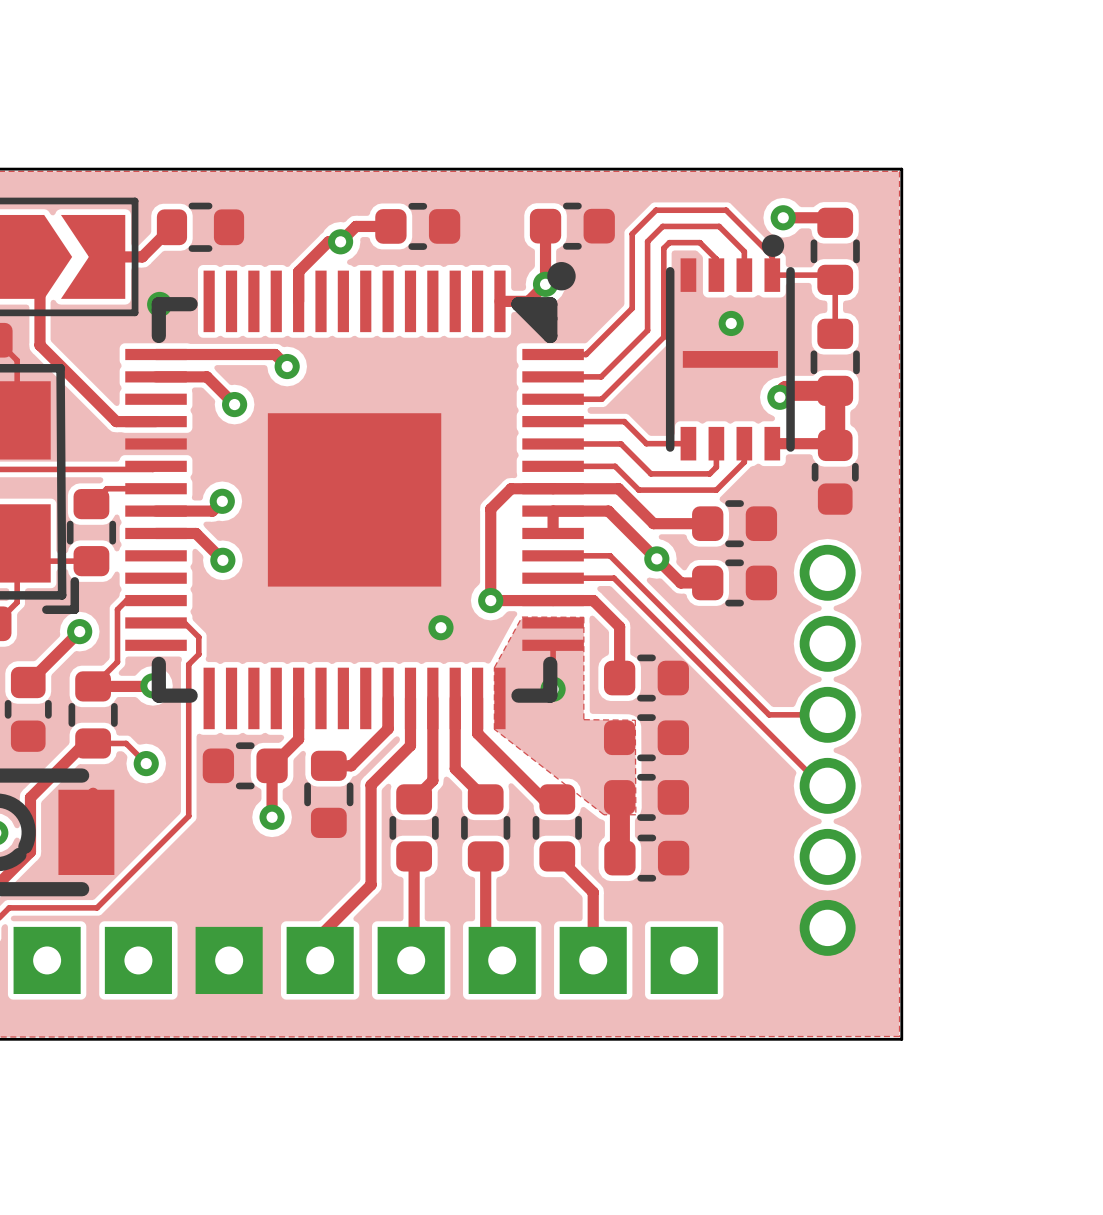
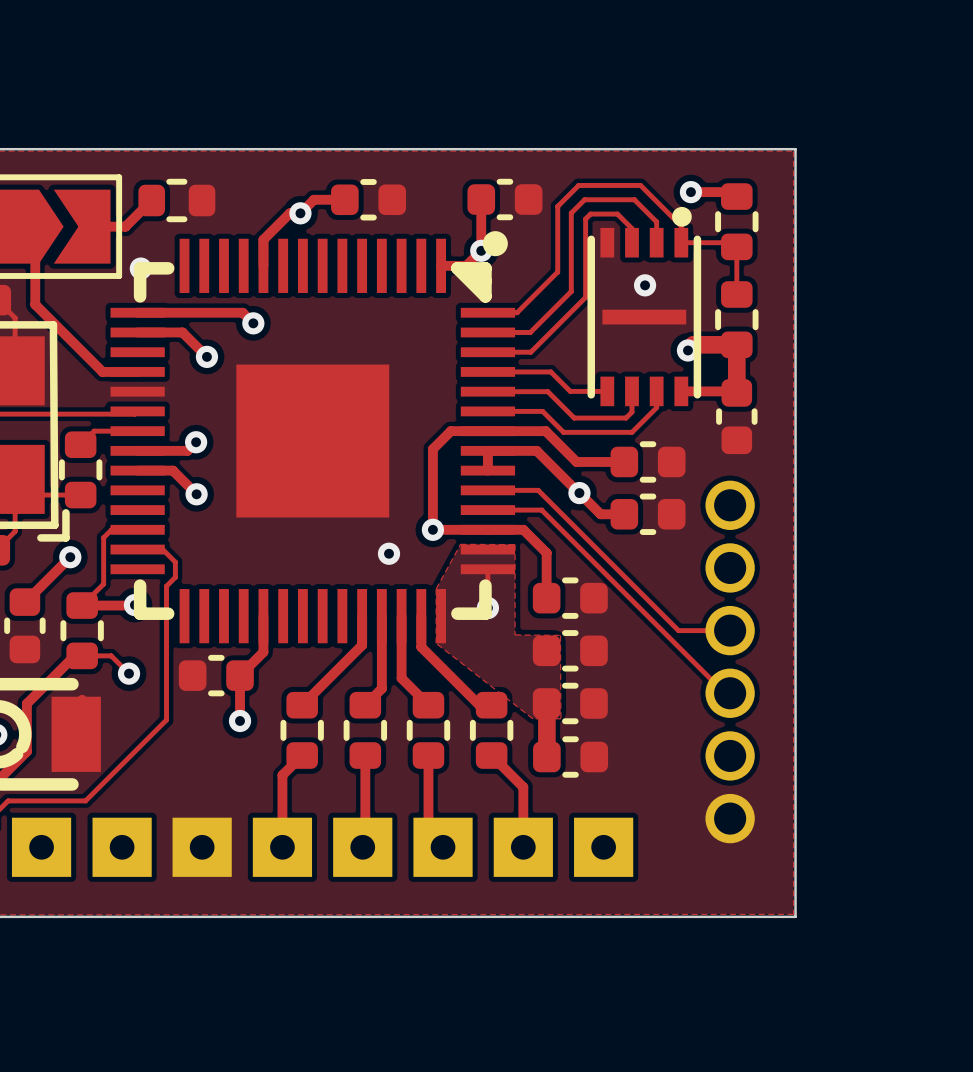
track: (388, 698) (388, 728) (351, 765) (328, 765) -> none
track: (410, 731) (410, 745) (371, 785) (371, 884) (320, 935) -> (362, 645) (302, 705)
part position: (328, 794) -> (302, 730)
track: none -> (302, 755) (282, 775) (282, 825)

